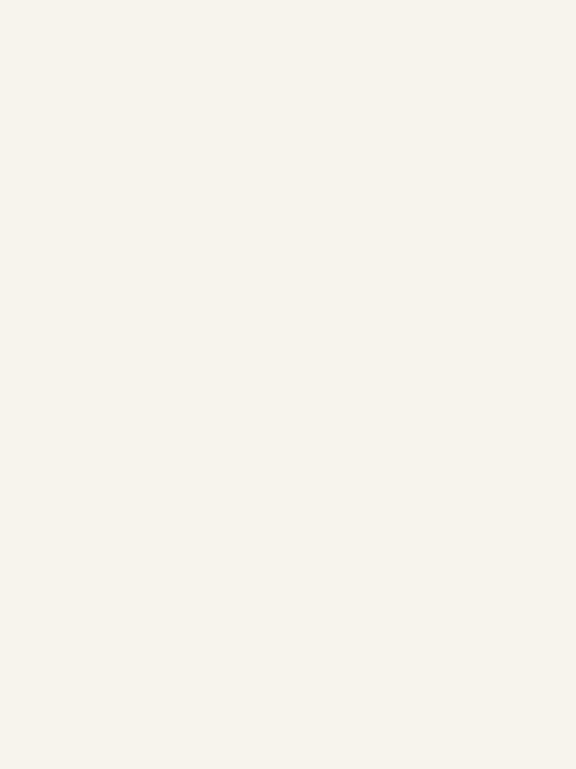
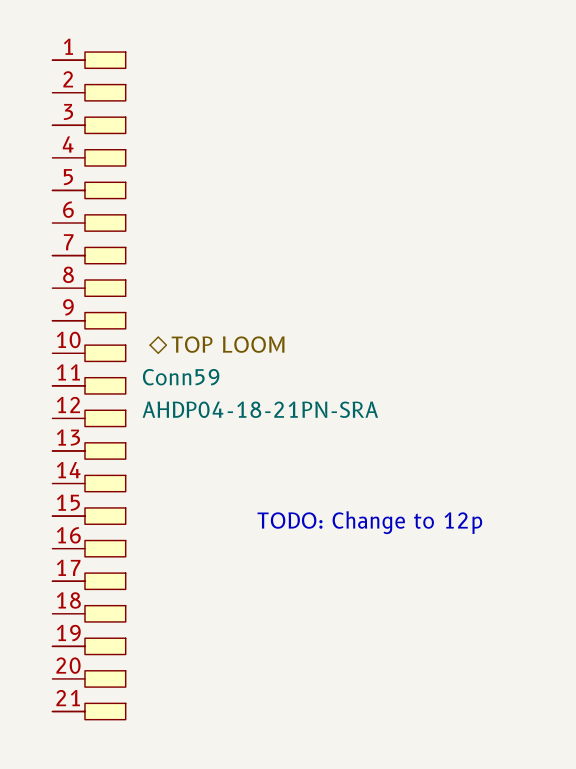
hierarchical label: none -> TOP LOOM (228, 344)
Conn59: none -> (89, 385)
text: none -> TODO: Change to 12p (369, 522)

